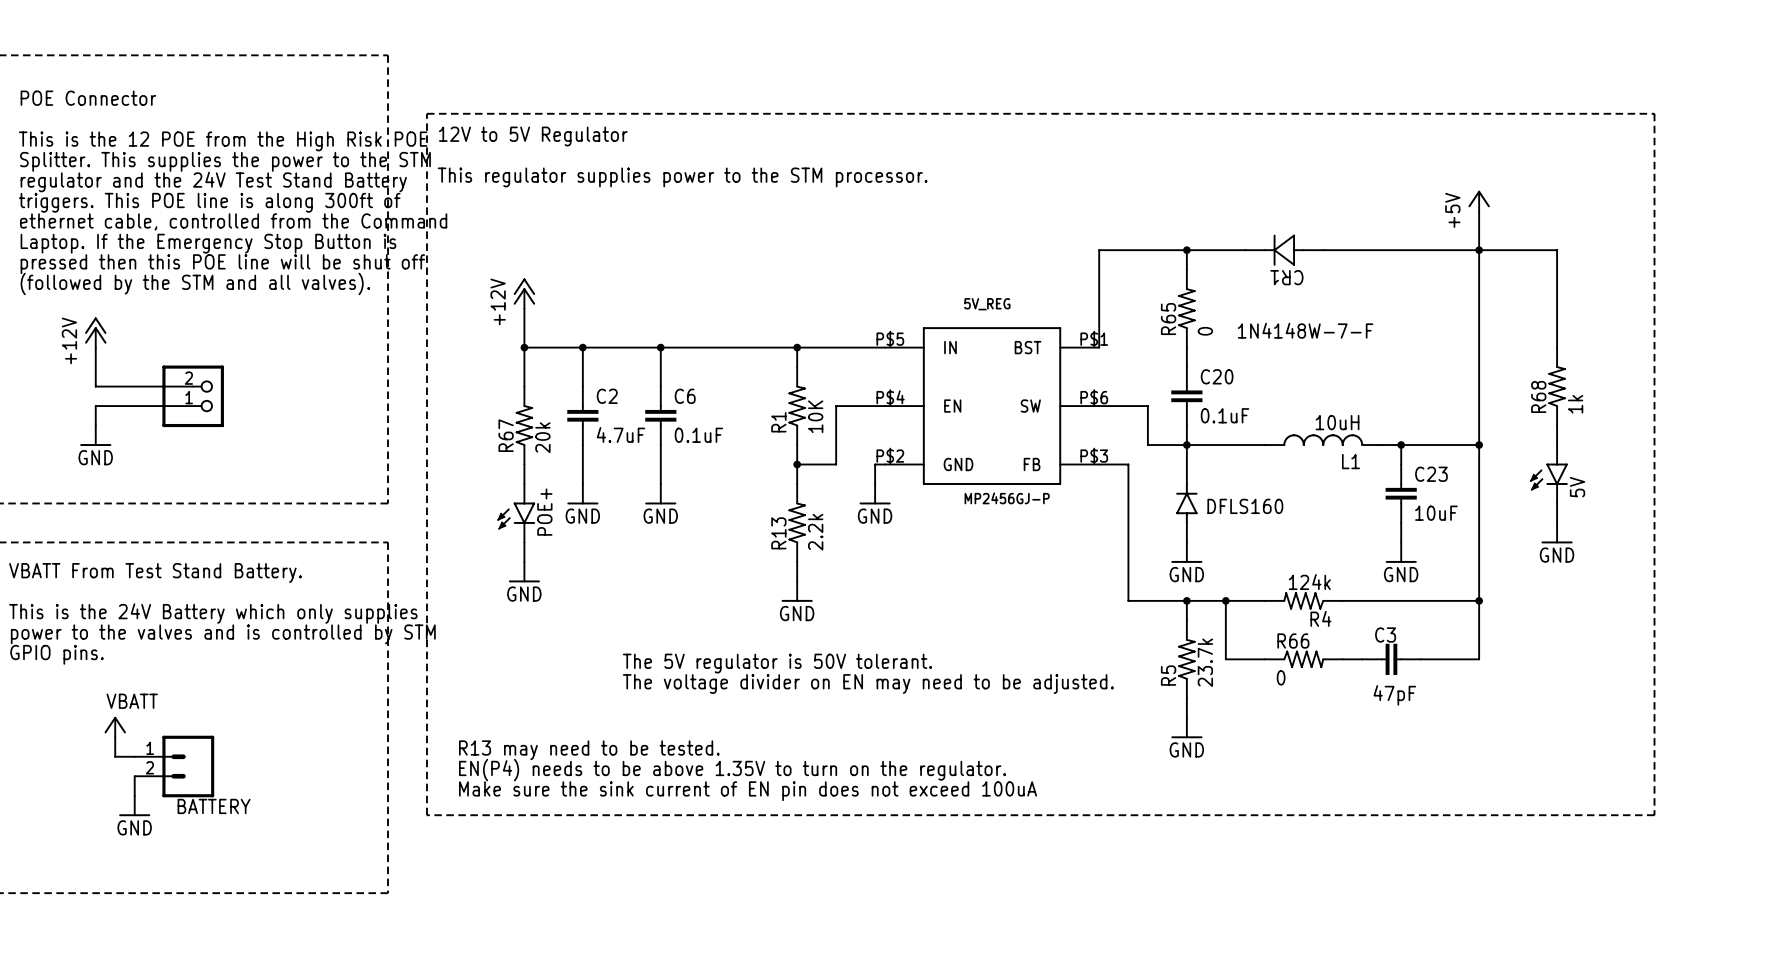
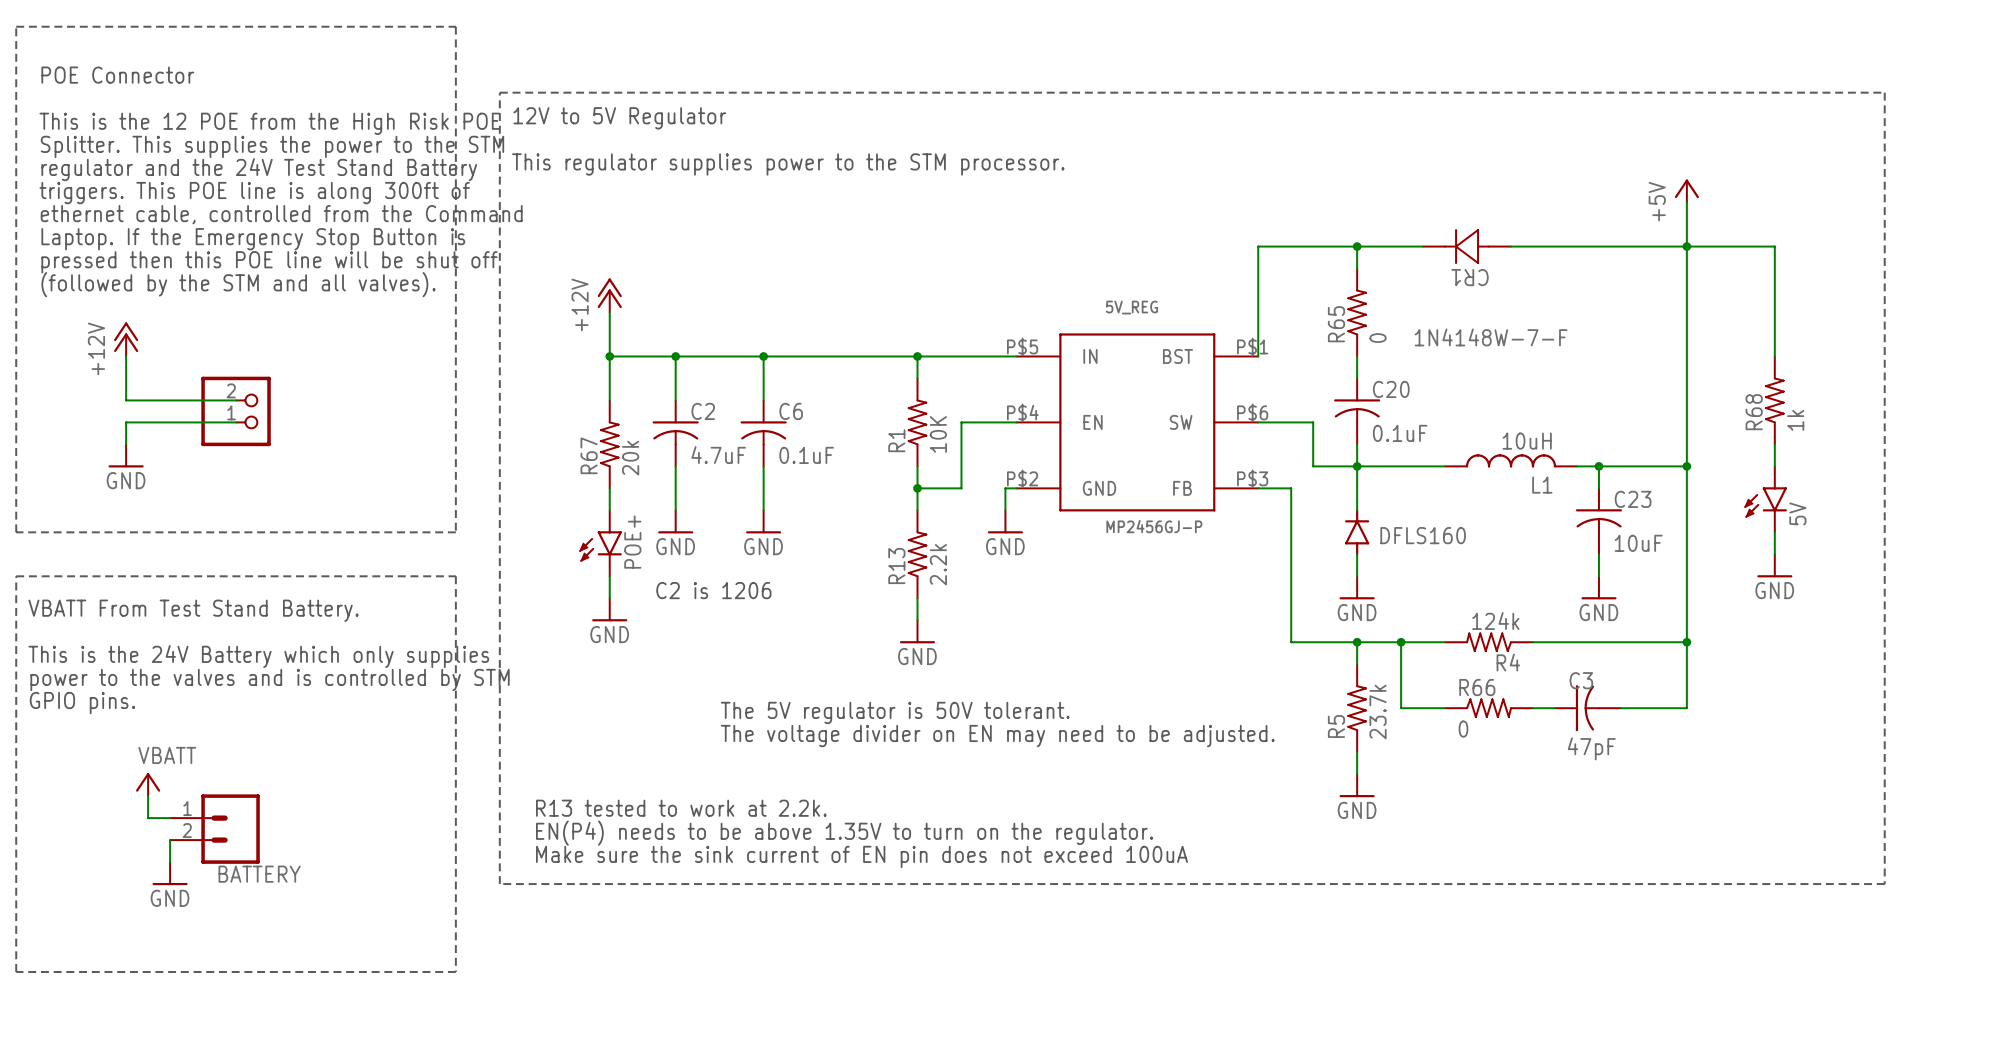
C20 symbol: [1171, 367, 1203, 426] -> [1334, 378, 1381, 445]
C2 symbol: [567, 386, 599, 446] -> [652, 400, 699, 467]
C6 symbol: [645, 386, 677, 446] -> [740, 400, 787, 467]
C23 symbol: [1385, 464, 1417, 523] -> [1575, 488, 1623, 555]
text: none -> C2 is 1206 (713, 590)
C3 symbol: [1362, 643, 1421, 675] -> [1554, 685, 1621, 732]
text: R13 may need to be tested. (589, 750) -> R13 tested to work at 2.2k. (681, 808)

